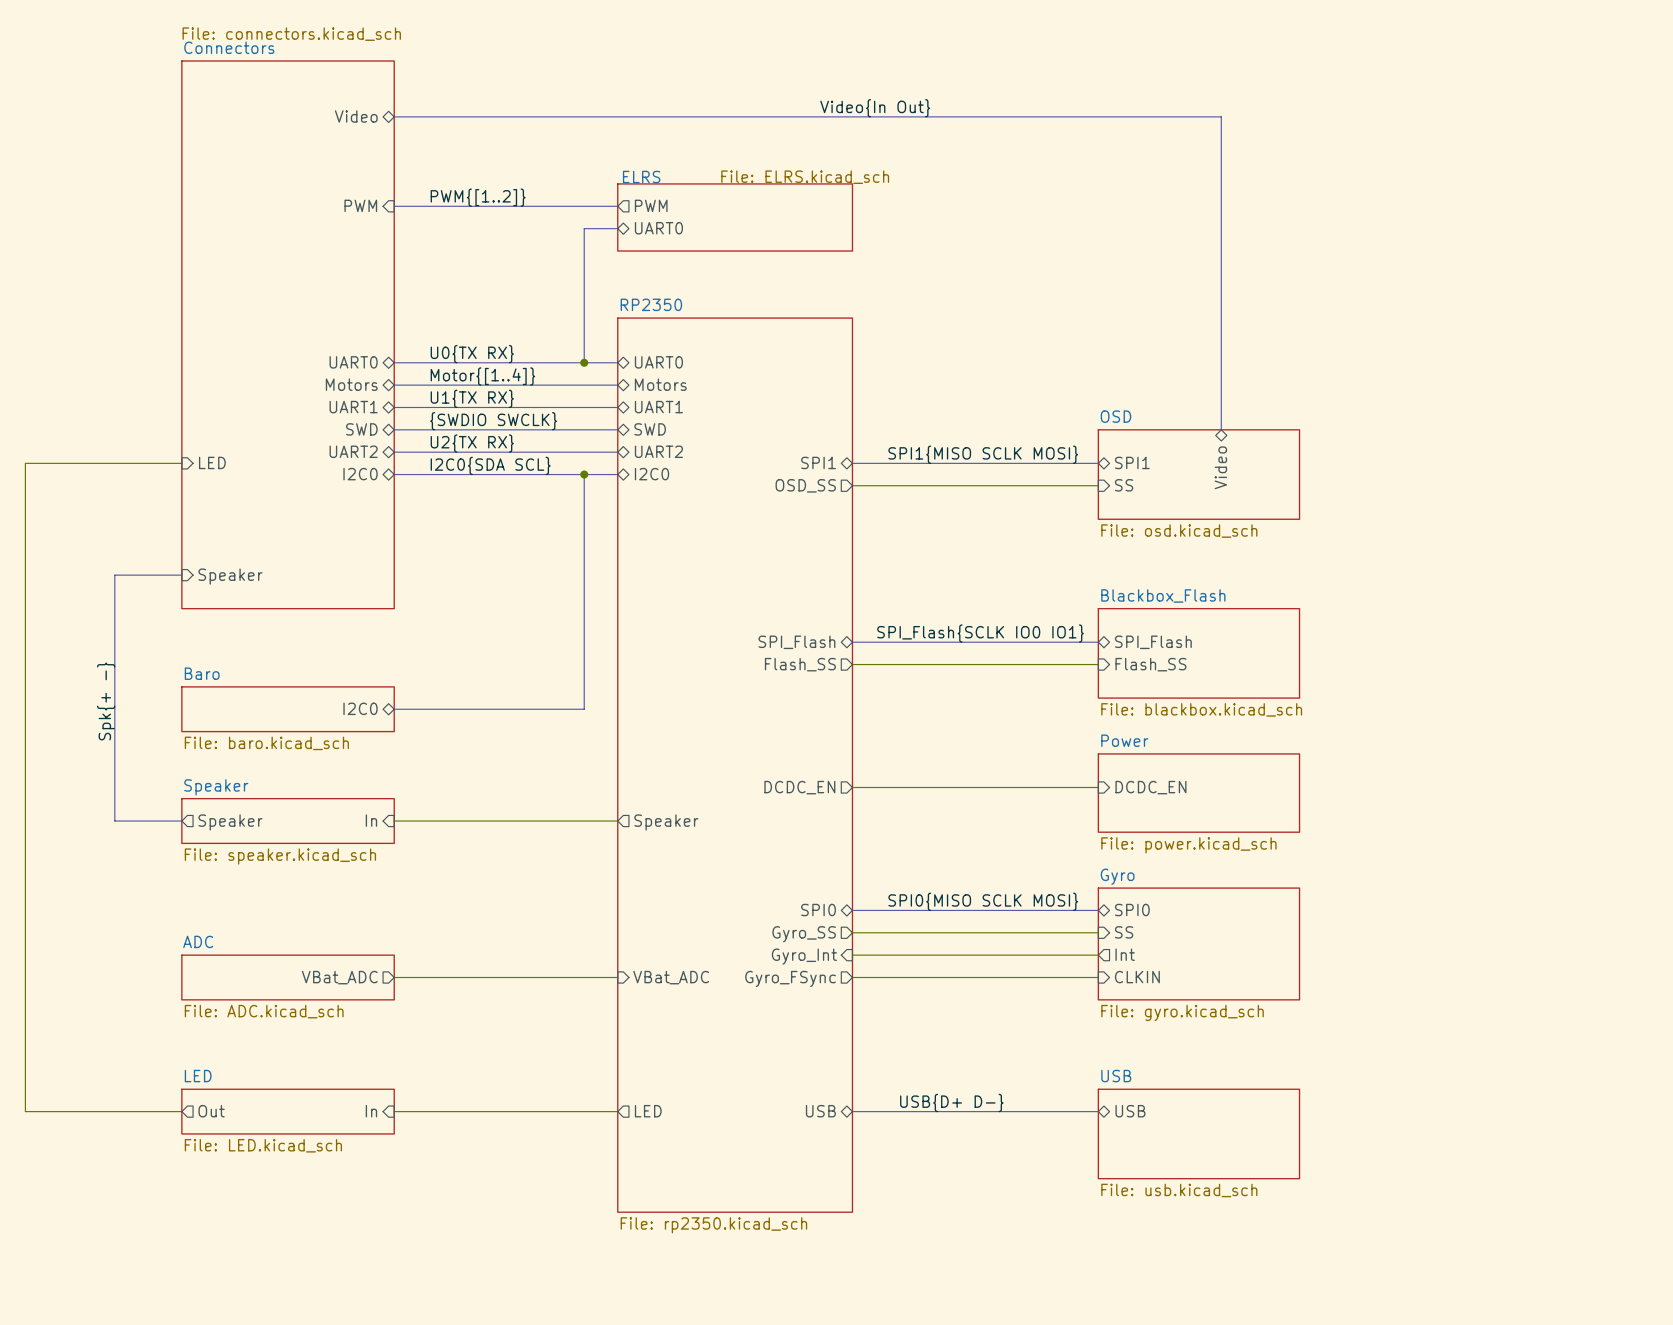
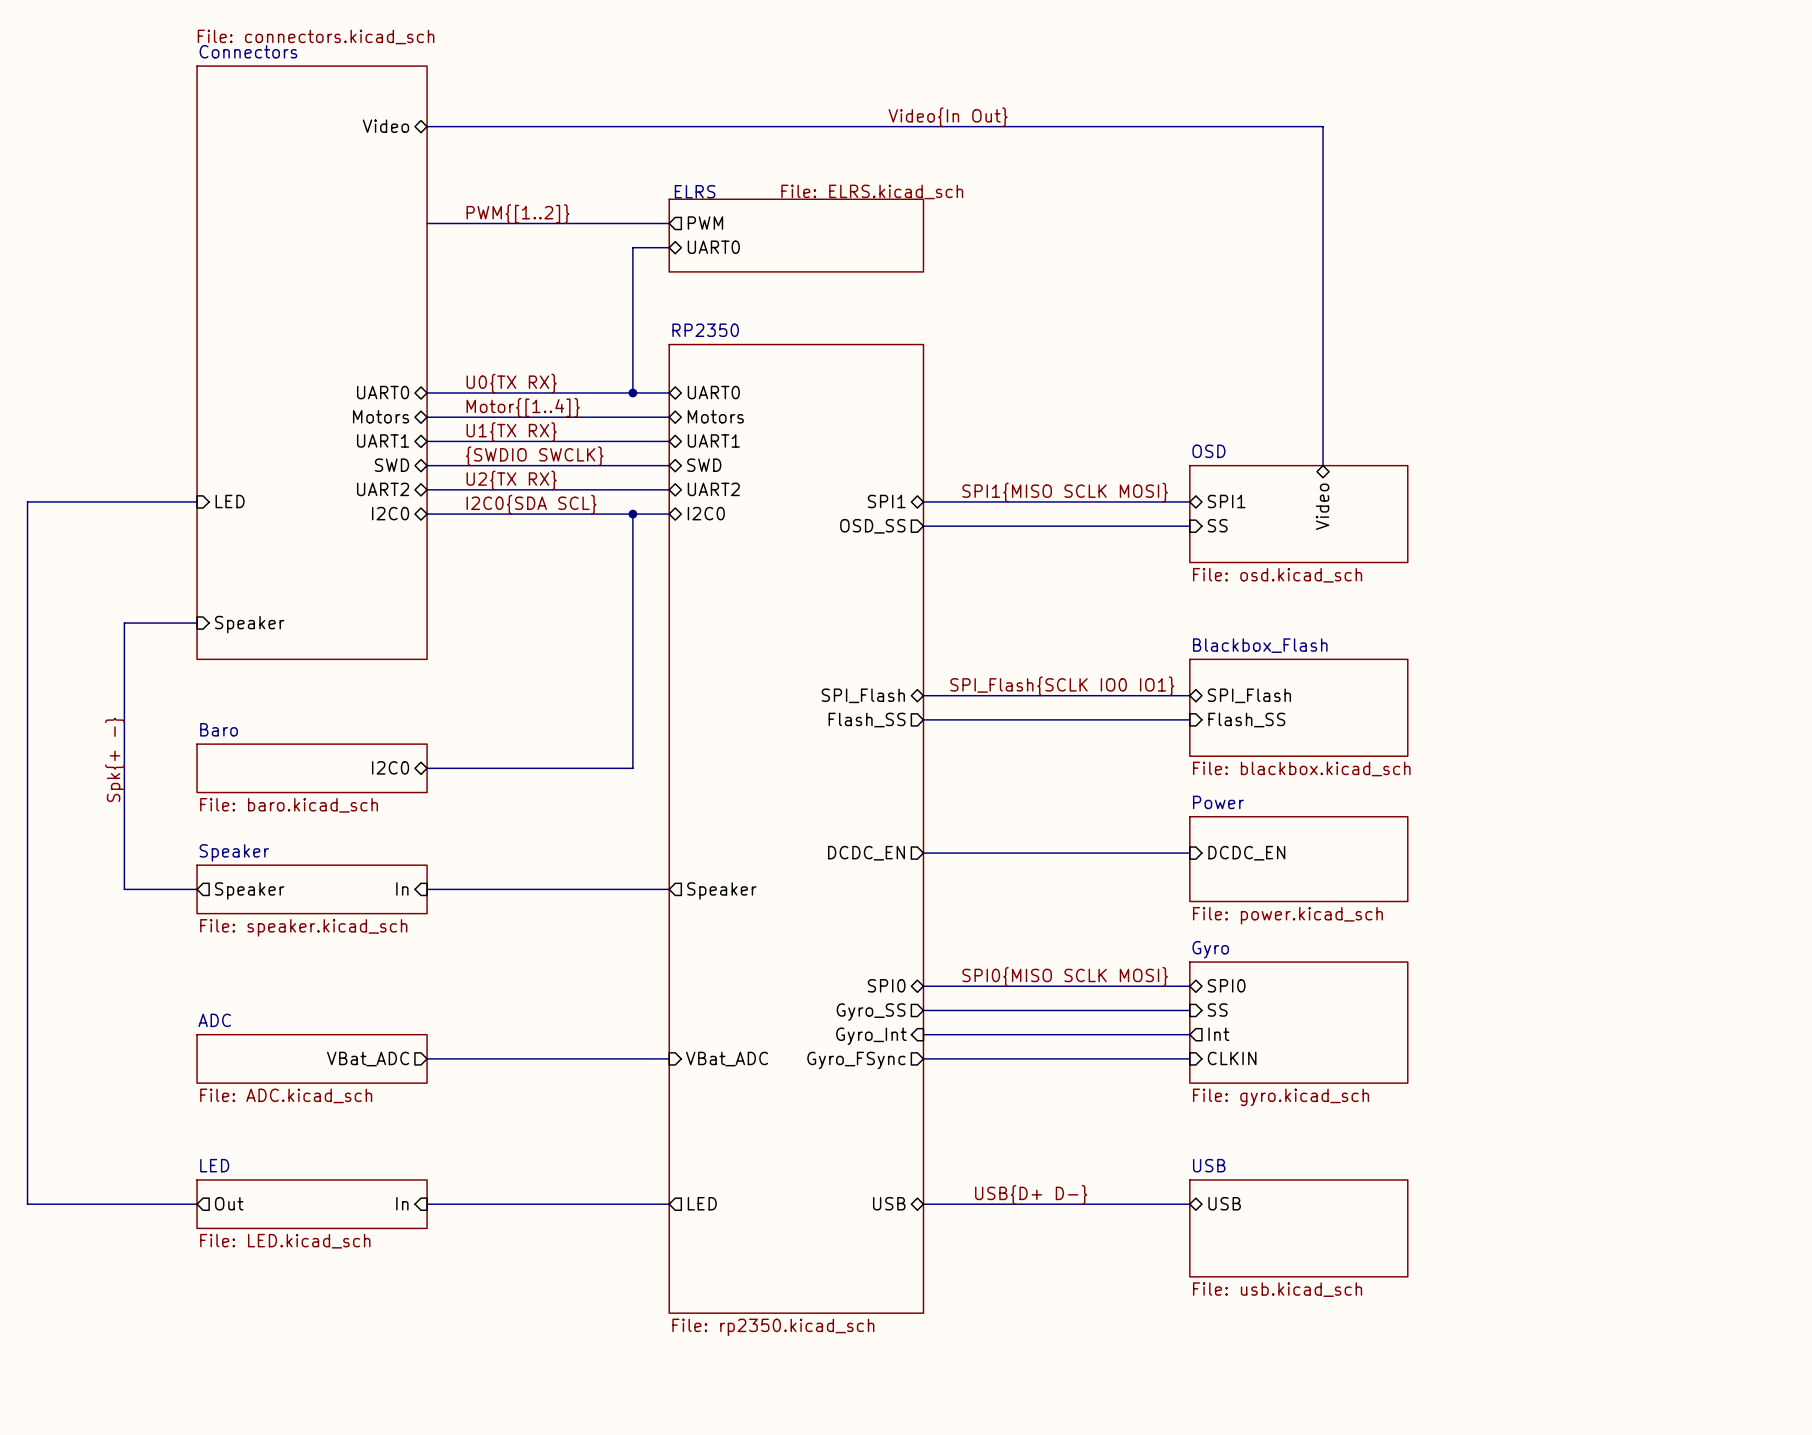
sheet pin: PWM (360, 205) -> none

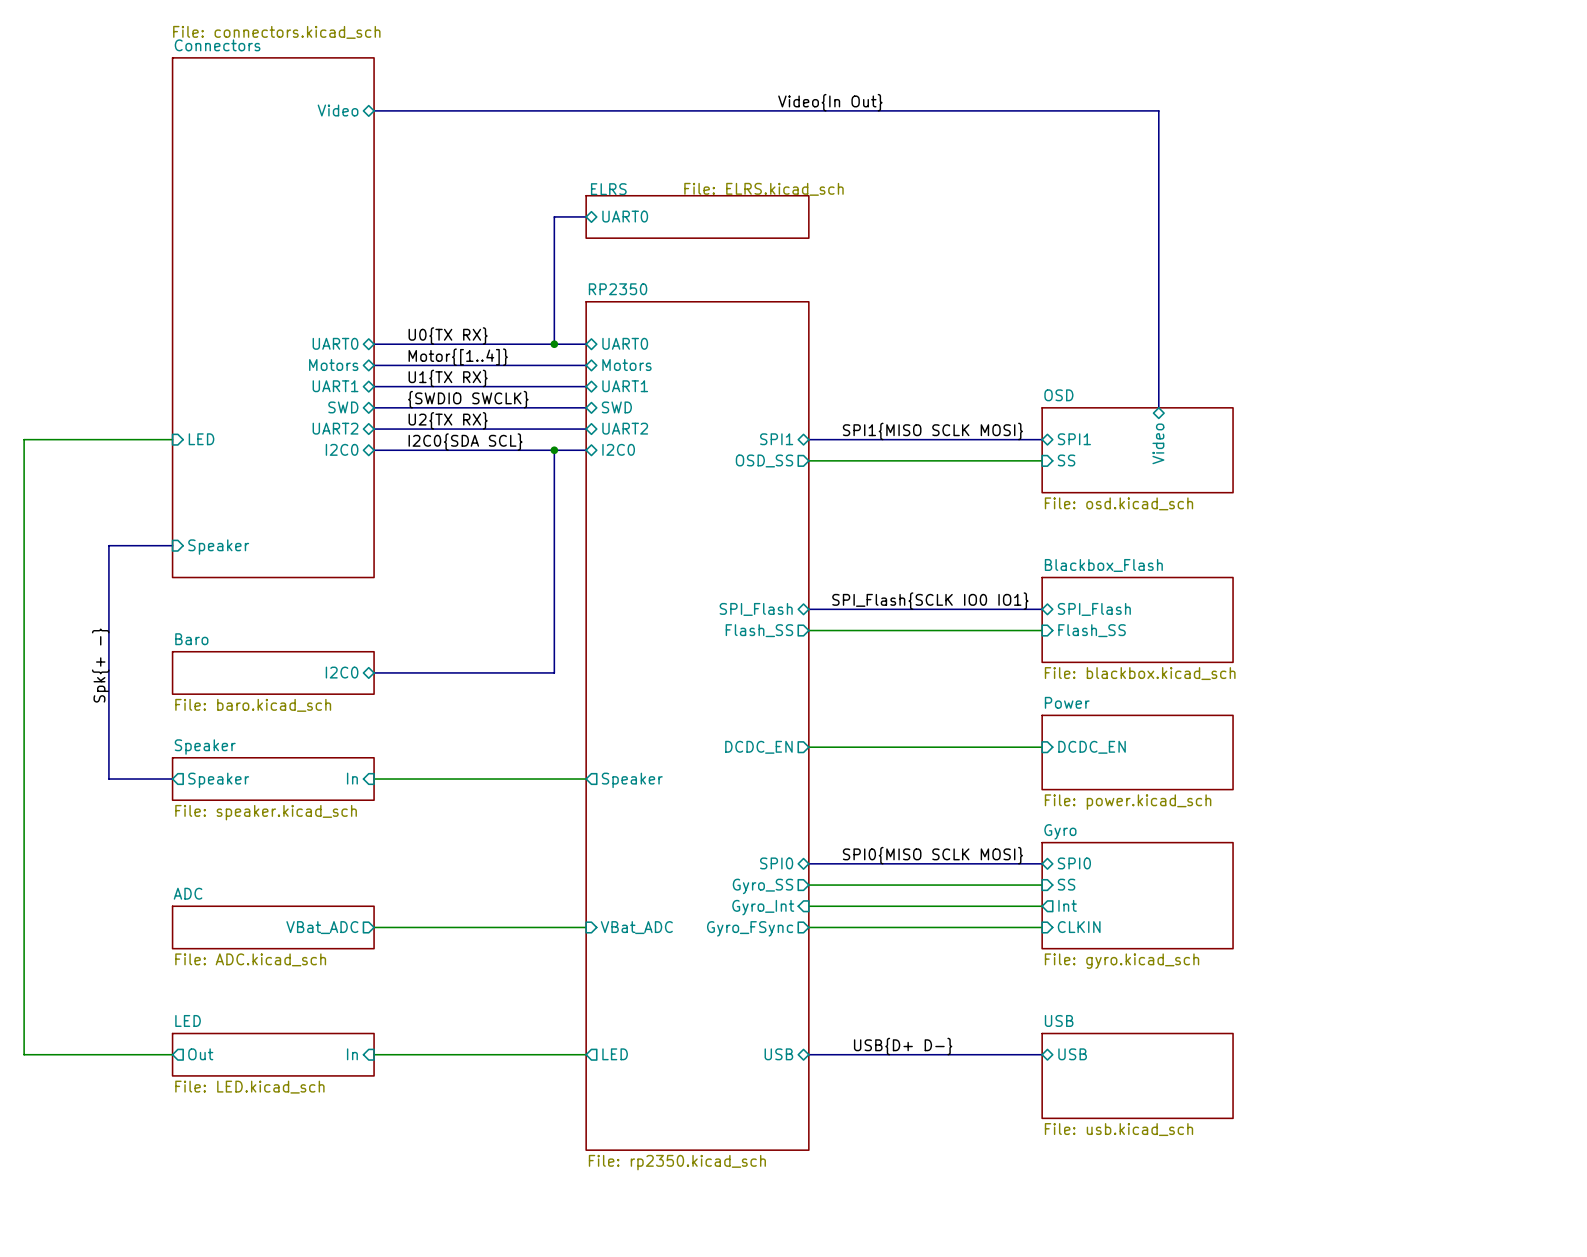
label: PWM{[1..2]} (517, 214) -> none
bus: (427, 223) (669, 223) -> none
sheet pin: PWM (705, 223) -> none
sheet ELRS: File: ELRS.kicad_sch (796, 235) -> none
sheet ELRS: none -> File: ELRS.kicad_sch (697, 216)

